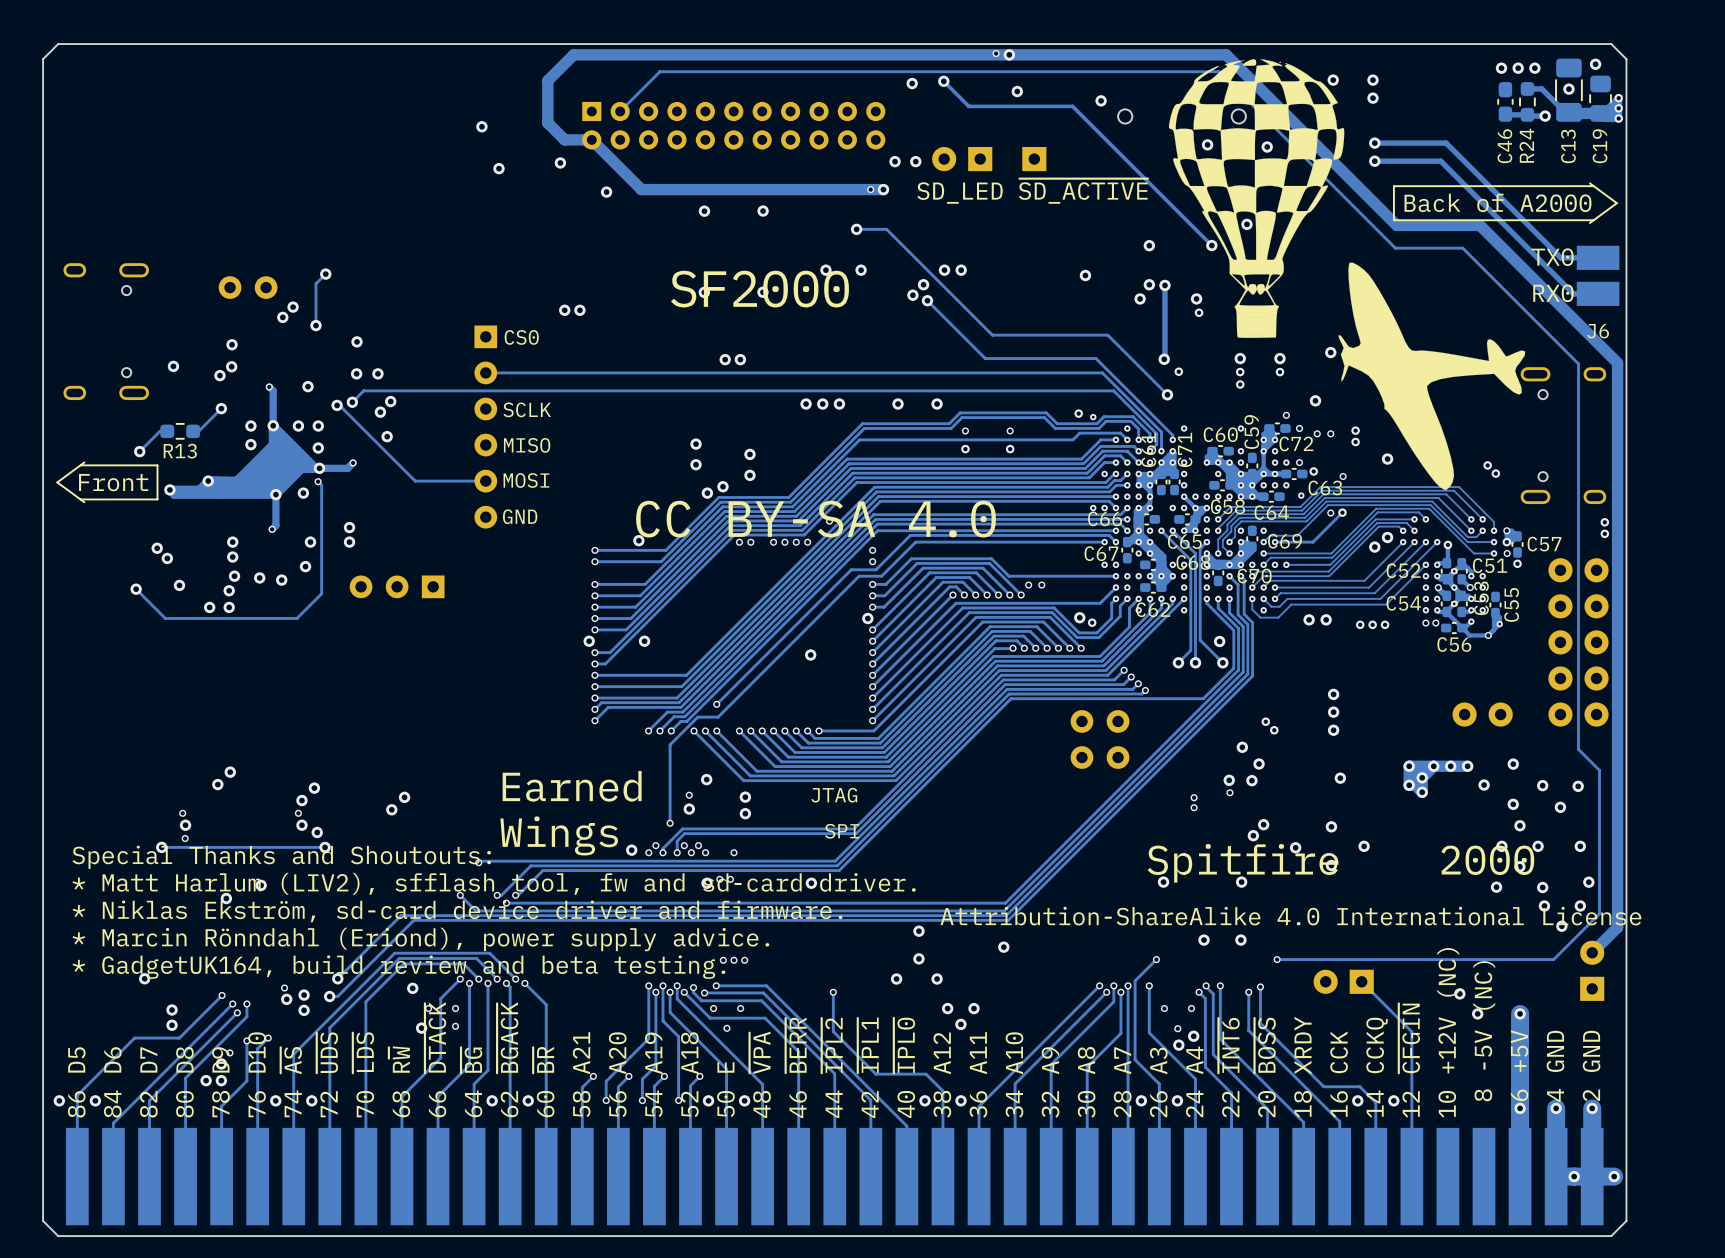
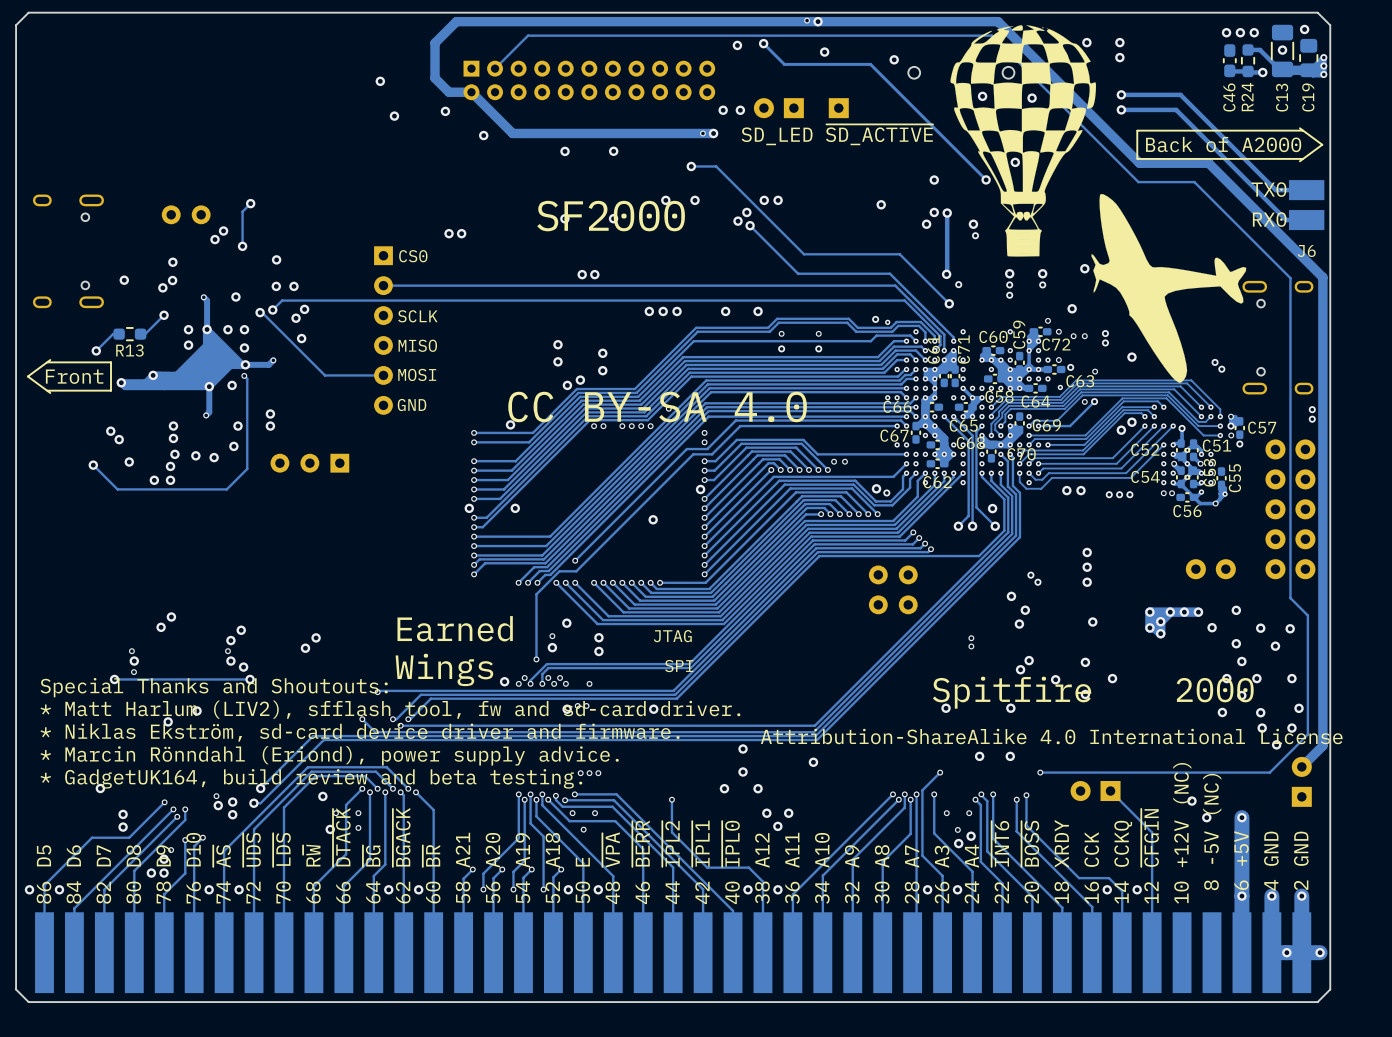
via: (1229, 780) -> none
via: (1229, 792) -> none

